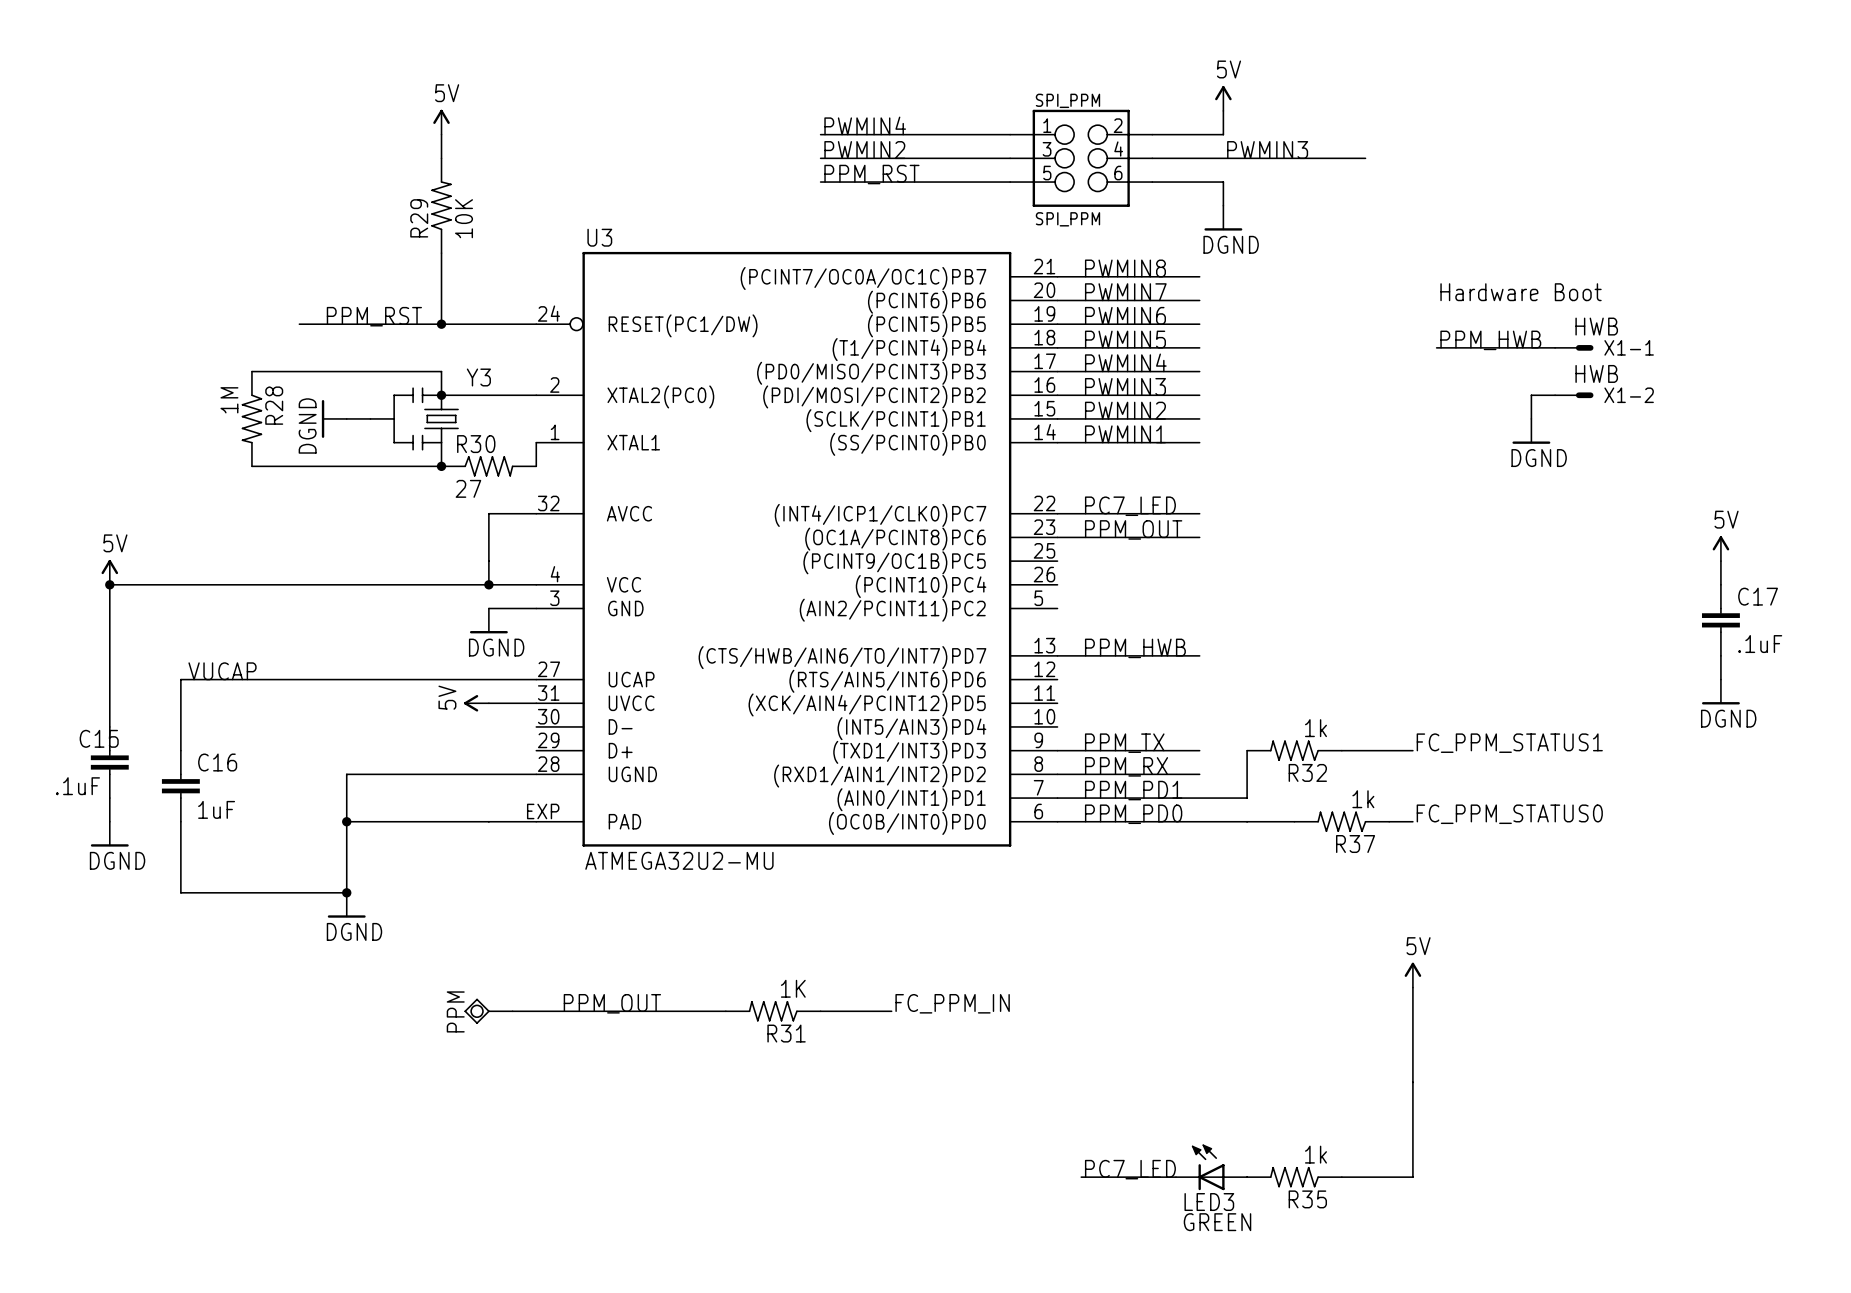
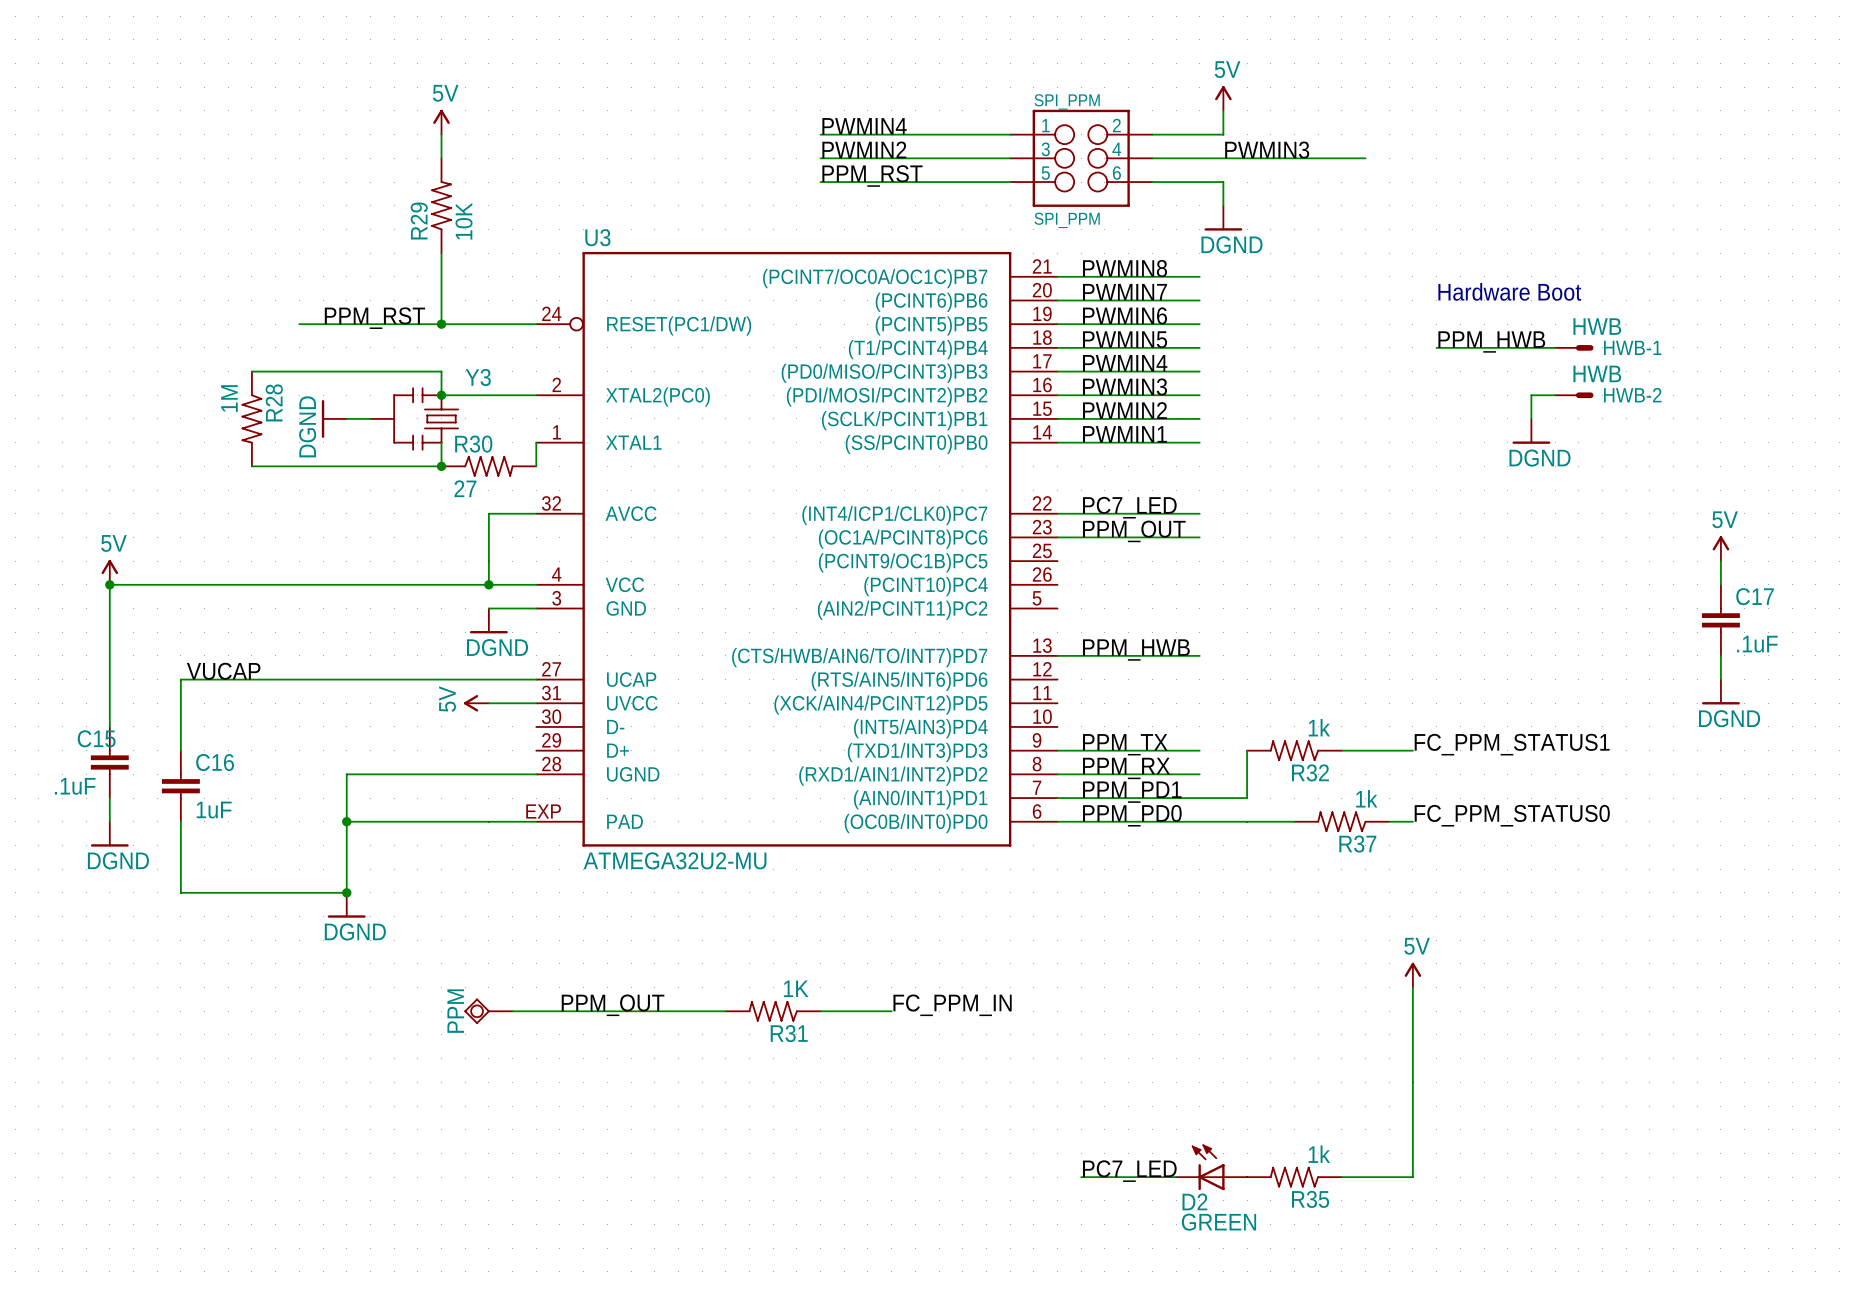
X1-1 name: X1-1 (1629, 347) -> HWB-1 (1632, 347)
X1-2 name: X1-2 (1629, 395) -> HWB-2 (1632, 395)
LED3 name: LED3 (1209, 1202) -> D2 (1194, 1201)

